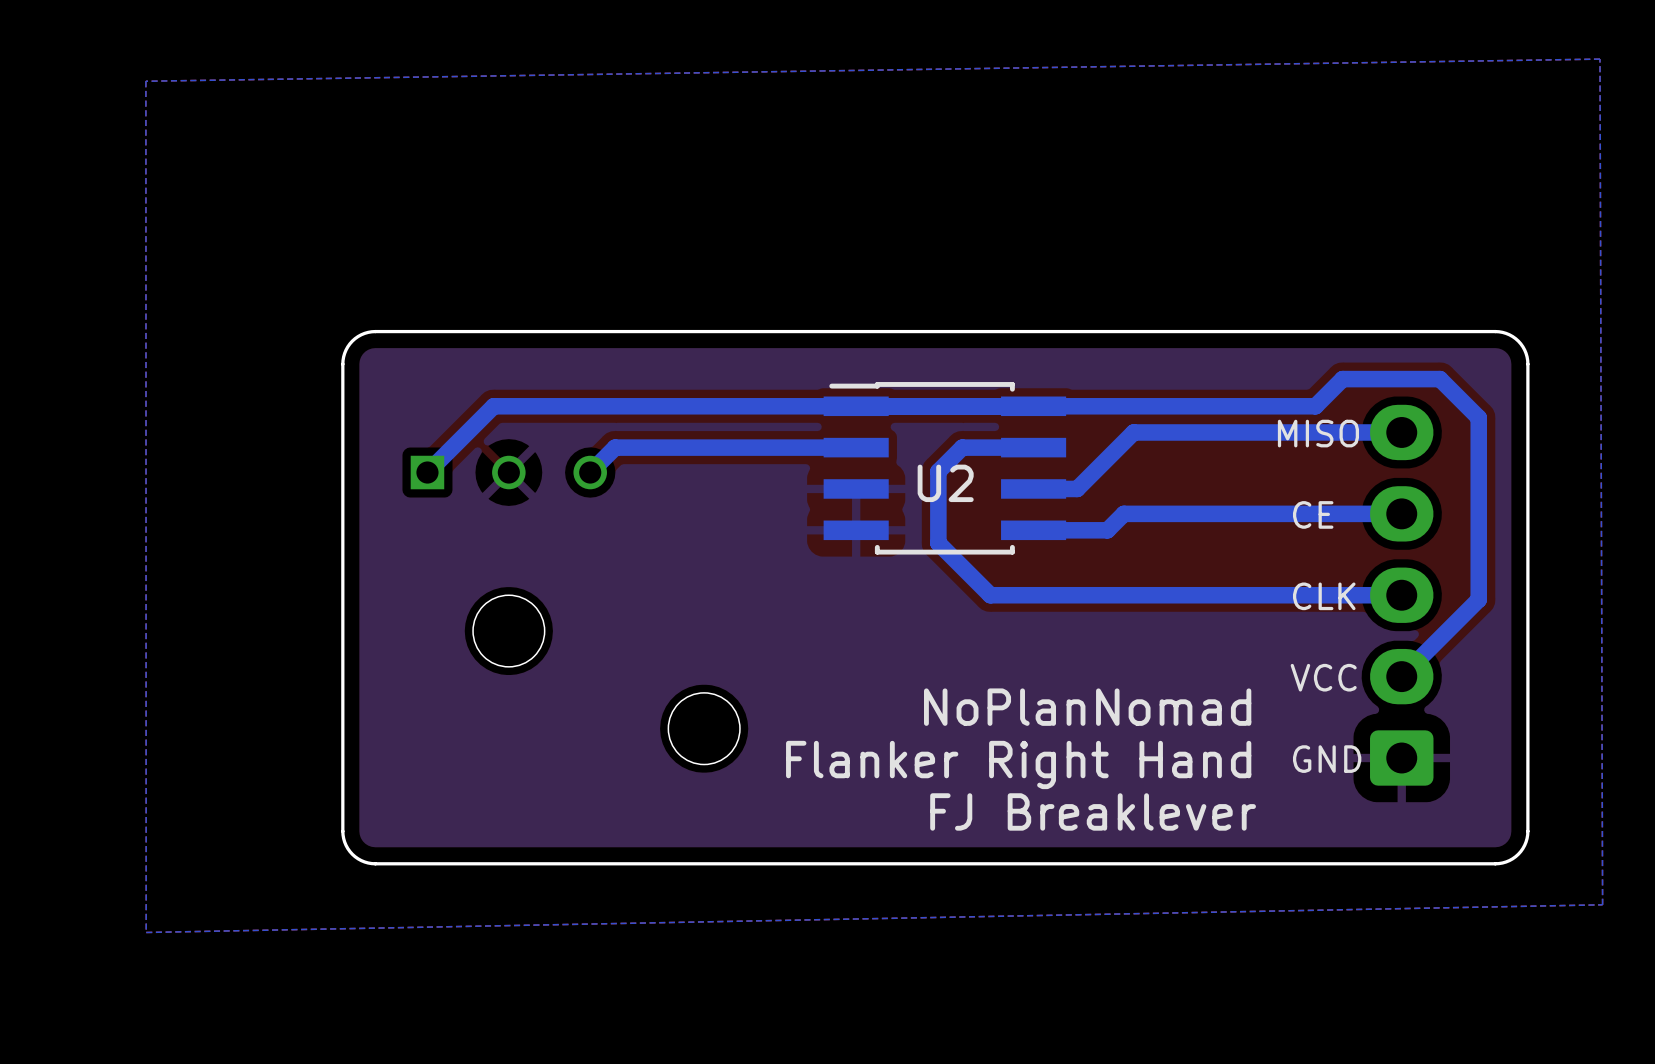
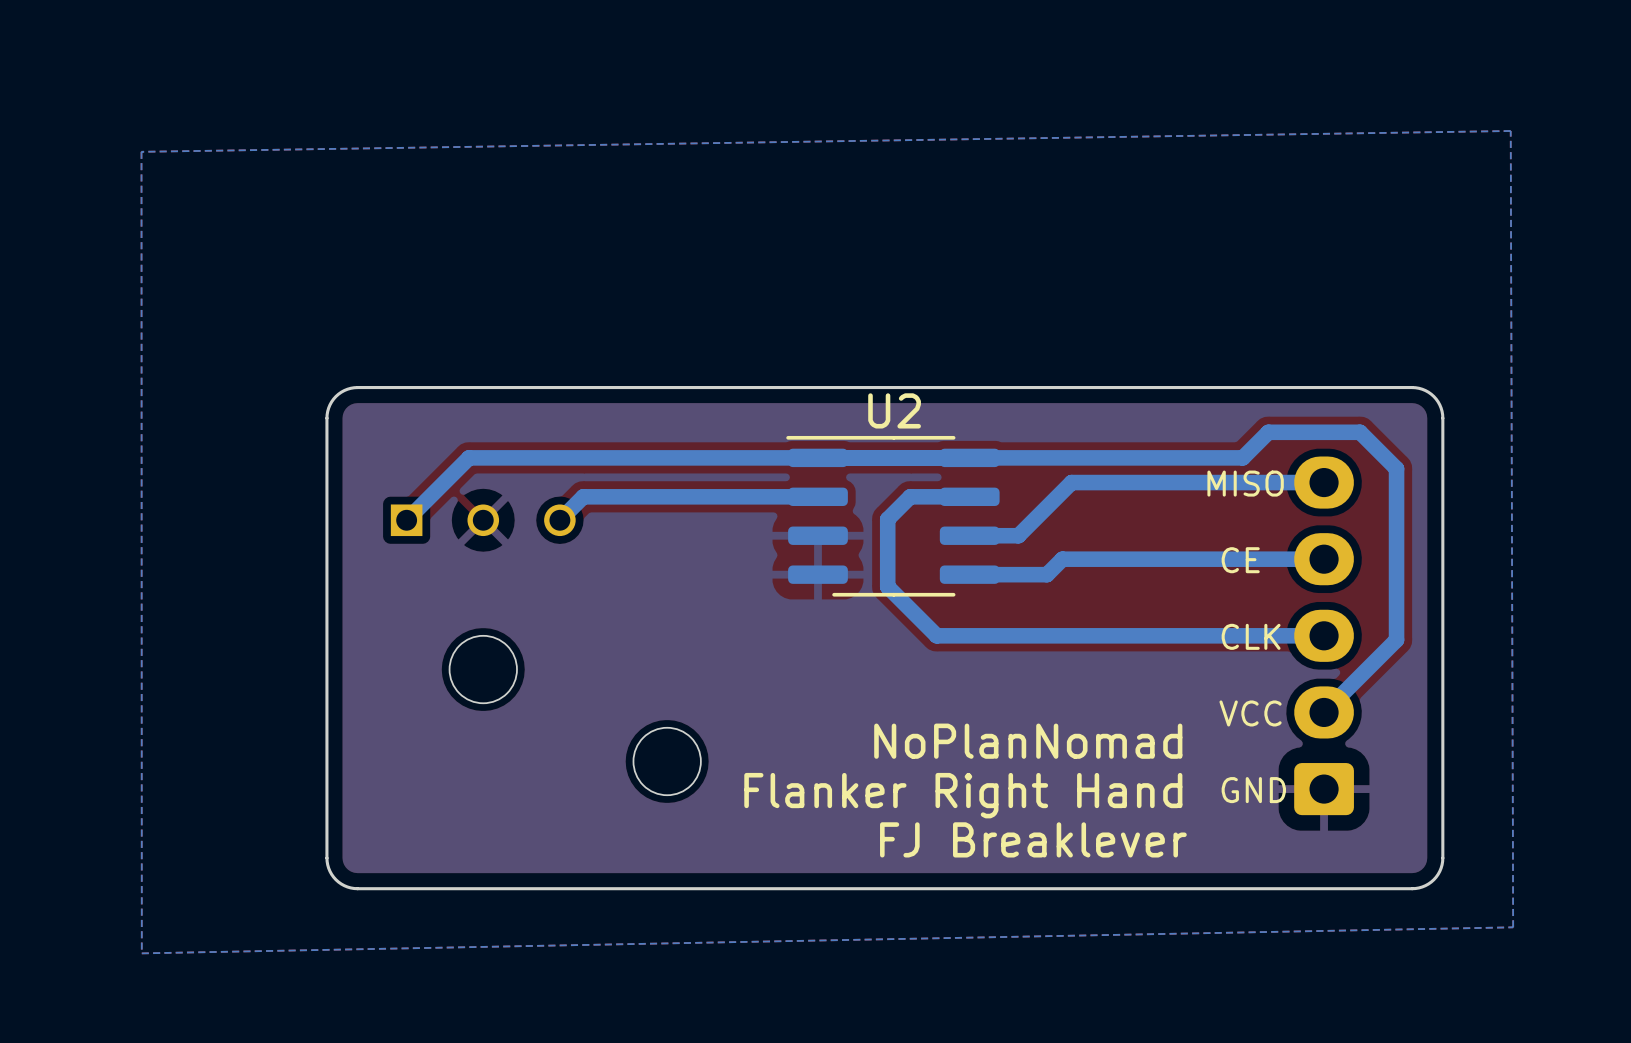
U2 footprint: [823, 382, 1067, 555] -> [786, 435, 1000, 597]
U2 name position: U2 (945, 483) -> U2 (894, 410)

